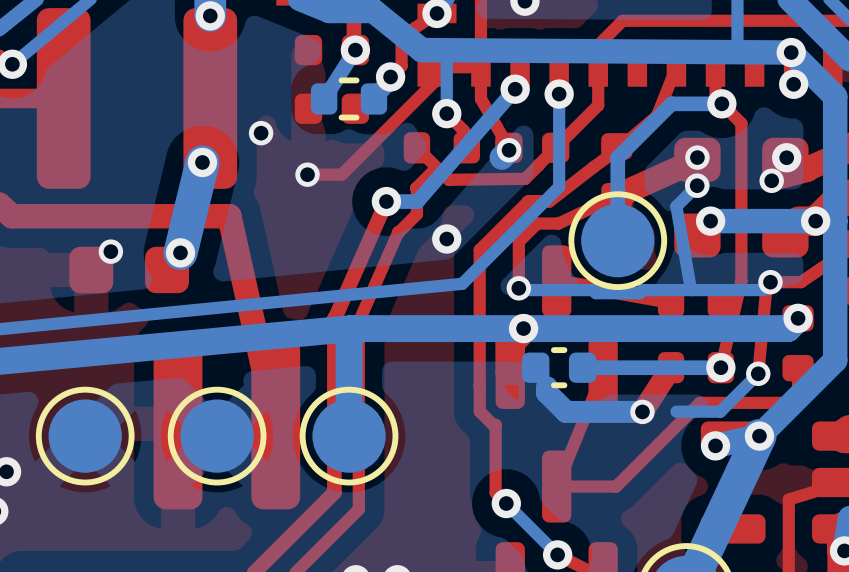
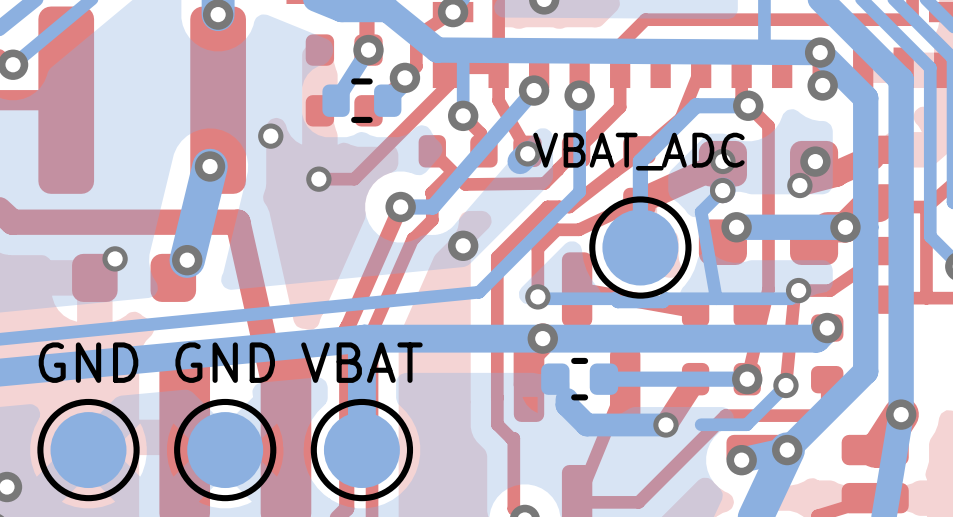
text: none -> VBAT_ADC (638, 151)
text: none -> GND (88, 362)
text: none -> GND (225, 362)
text: none -> VBAT (361, 362)

